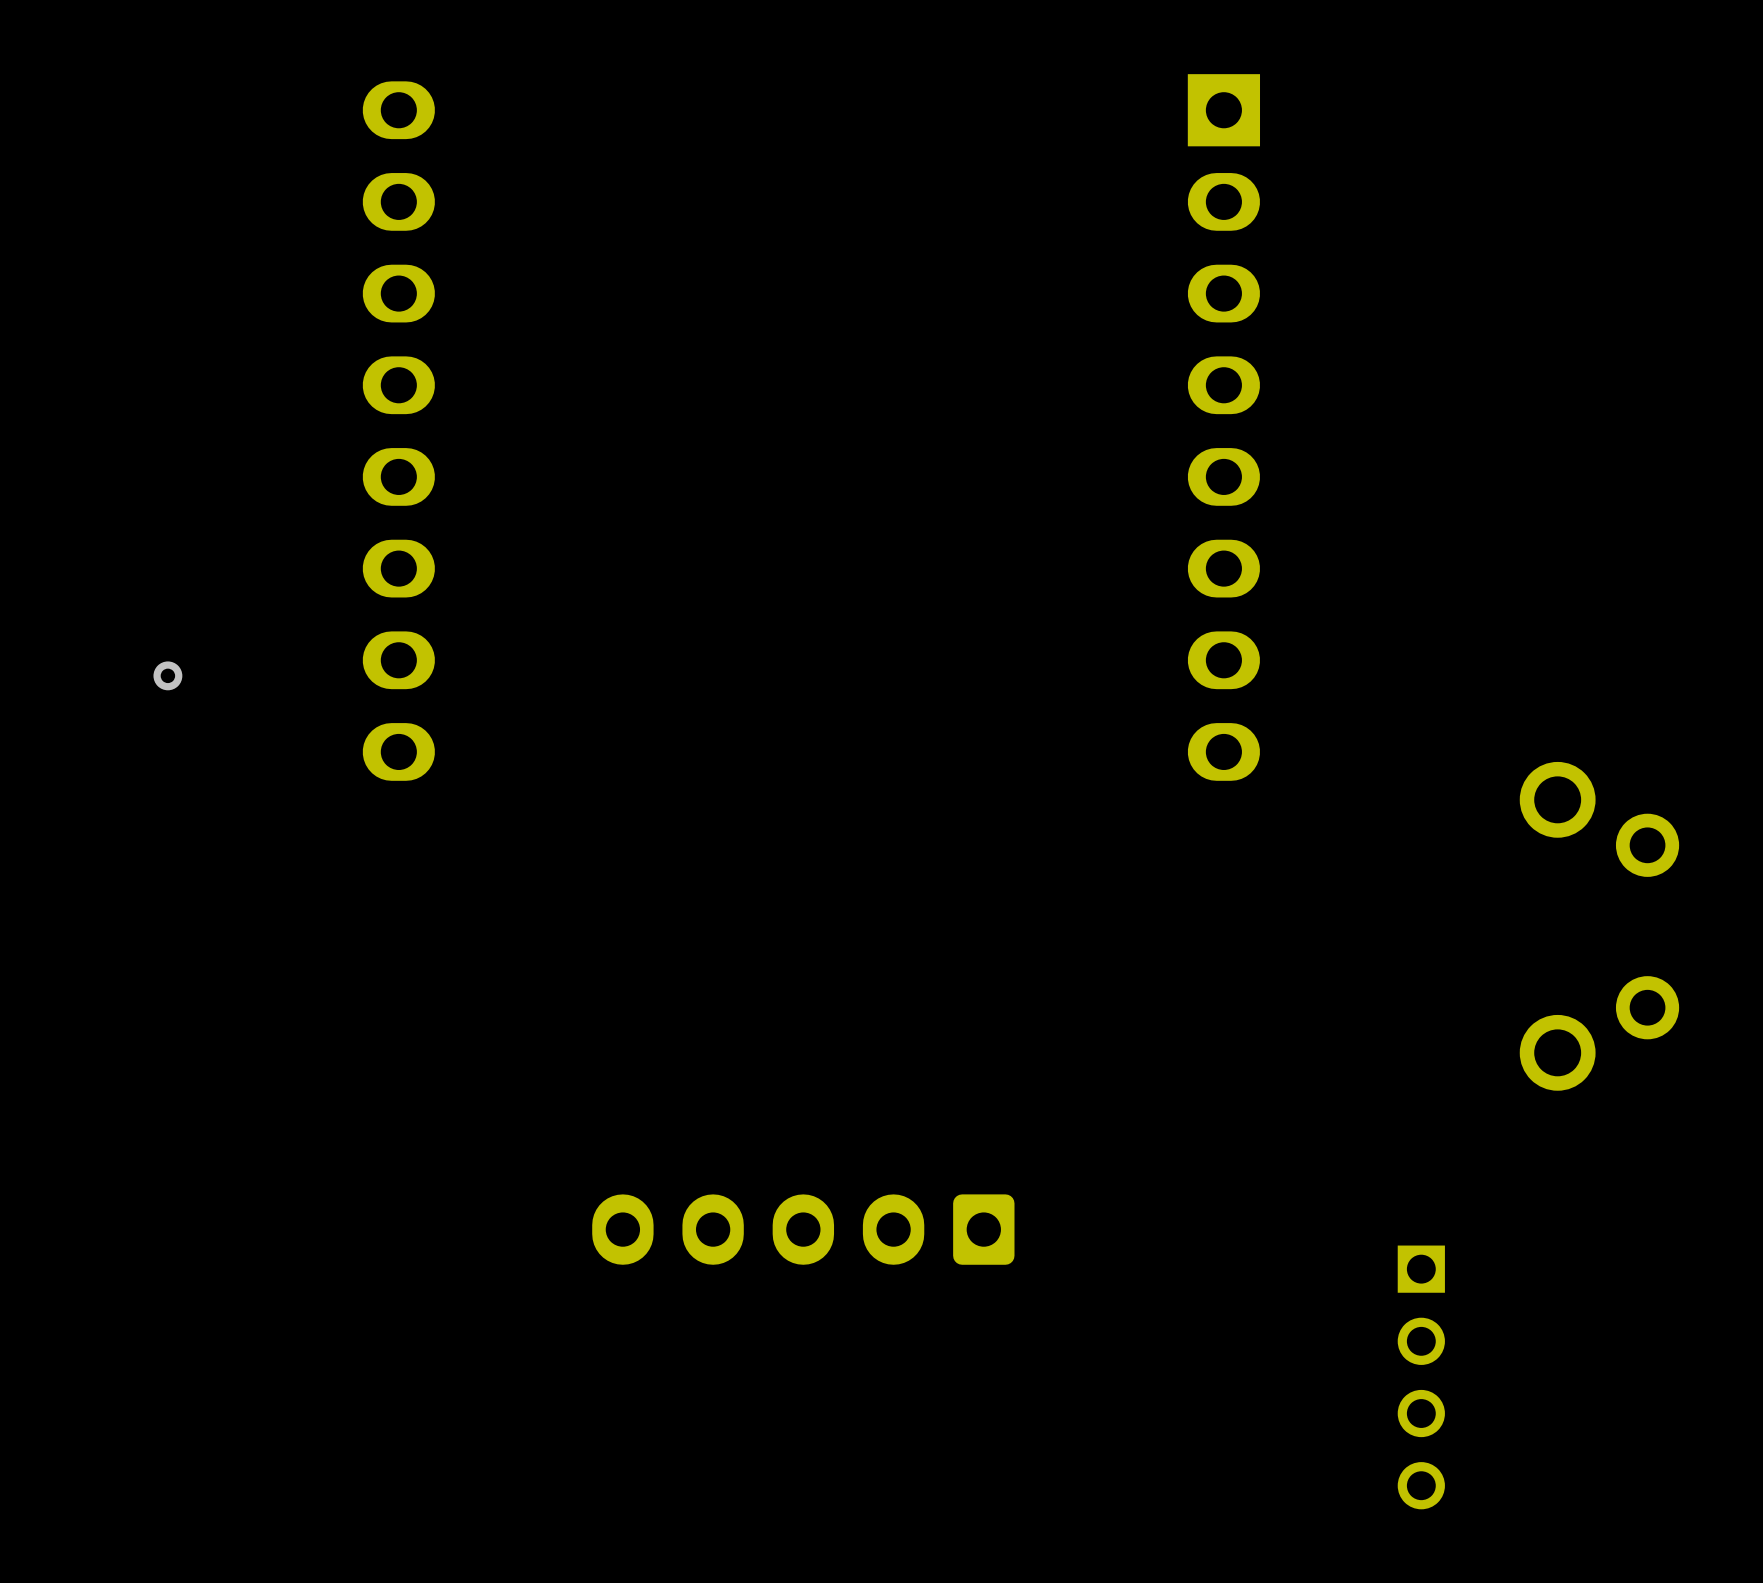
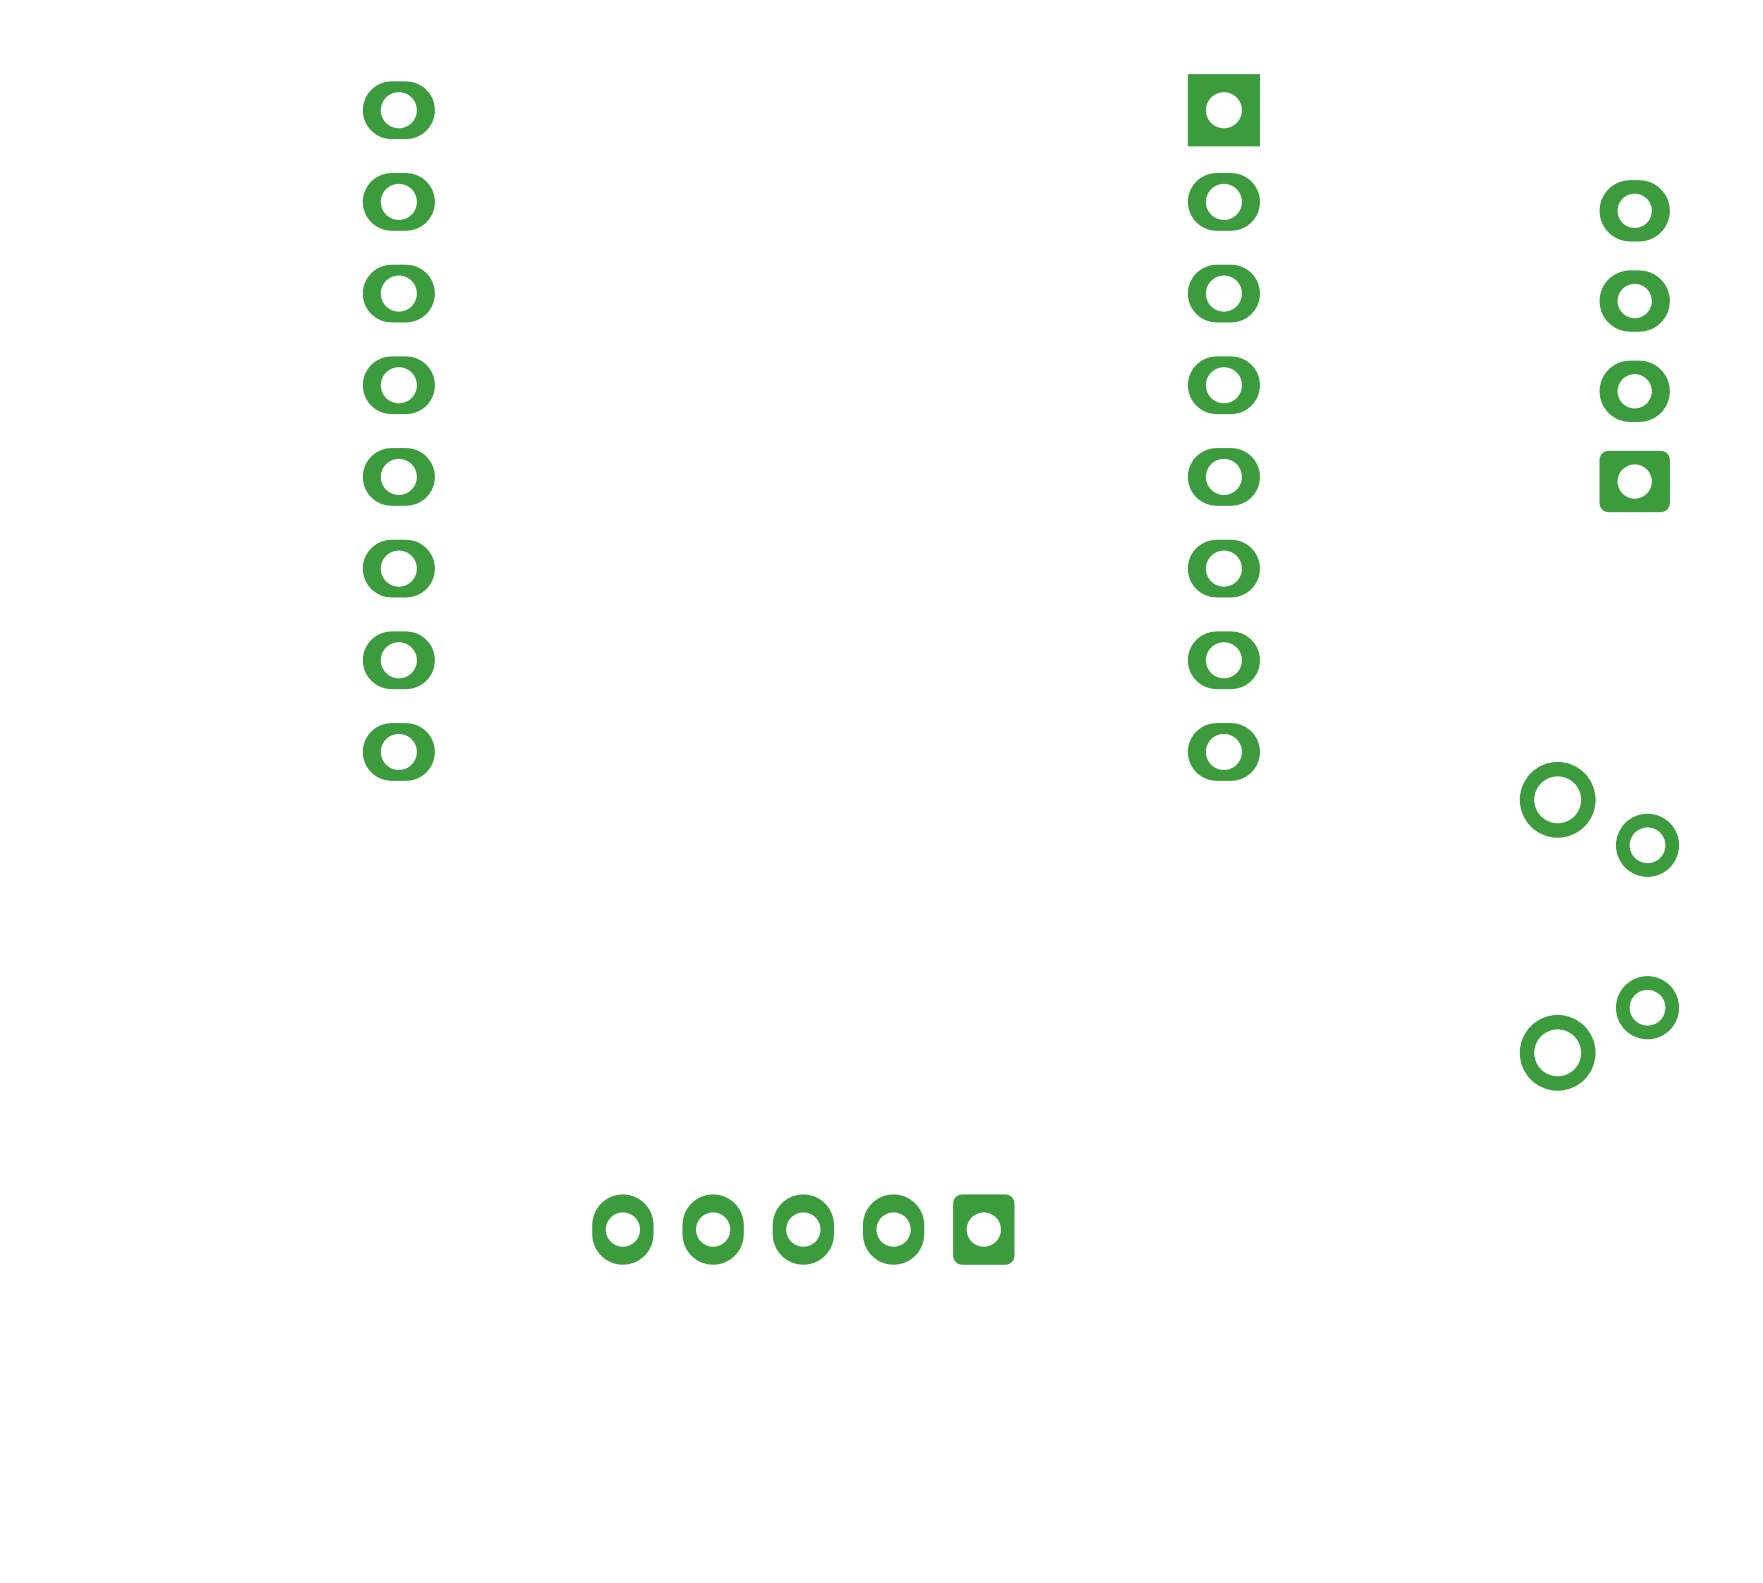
part: none -> (1634, 346)
via: (167, 675) -> none
part: (1421, 1377) -> none

